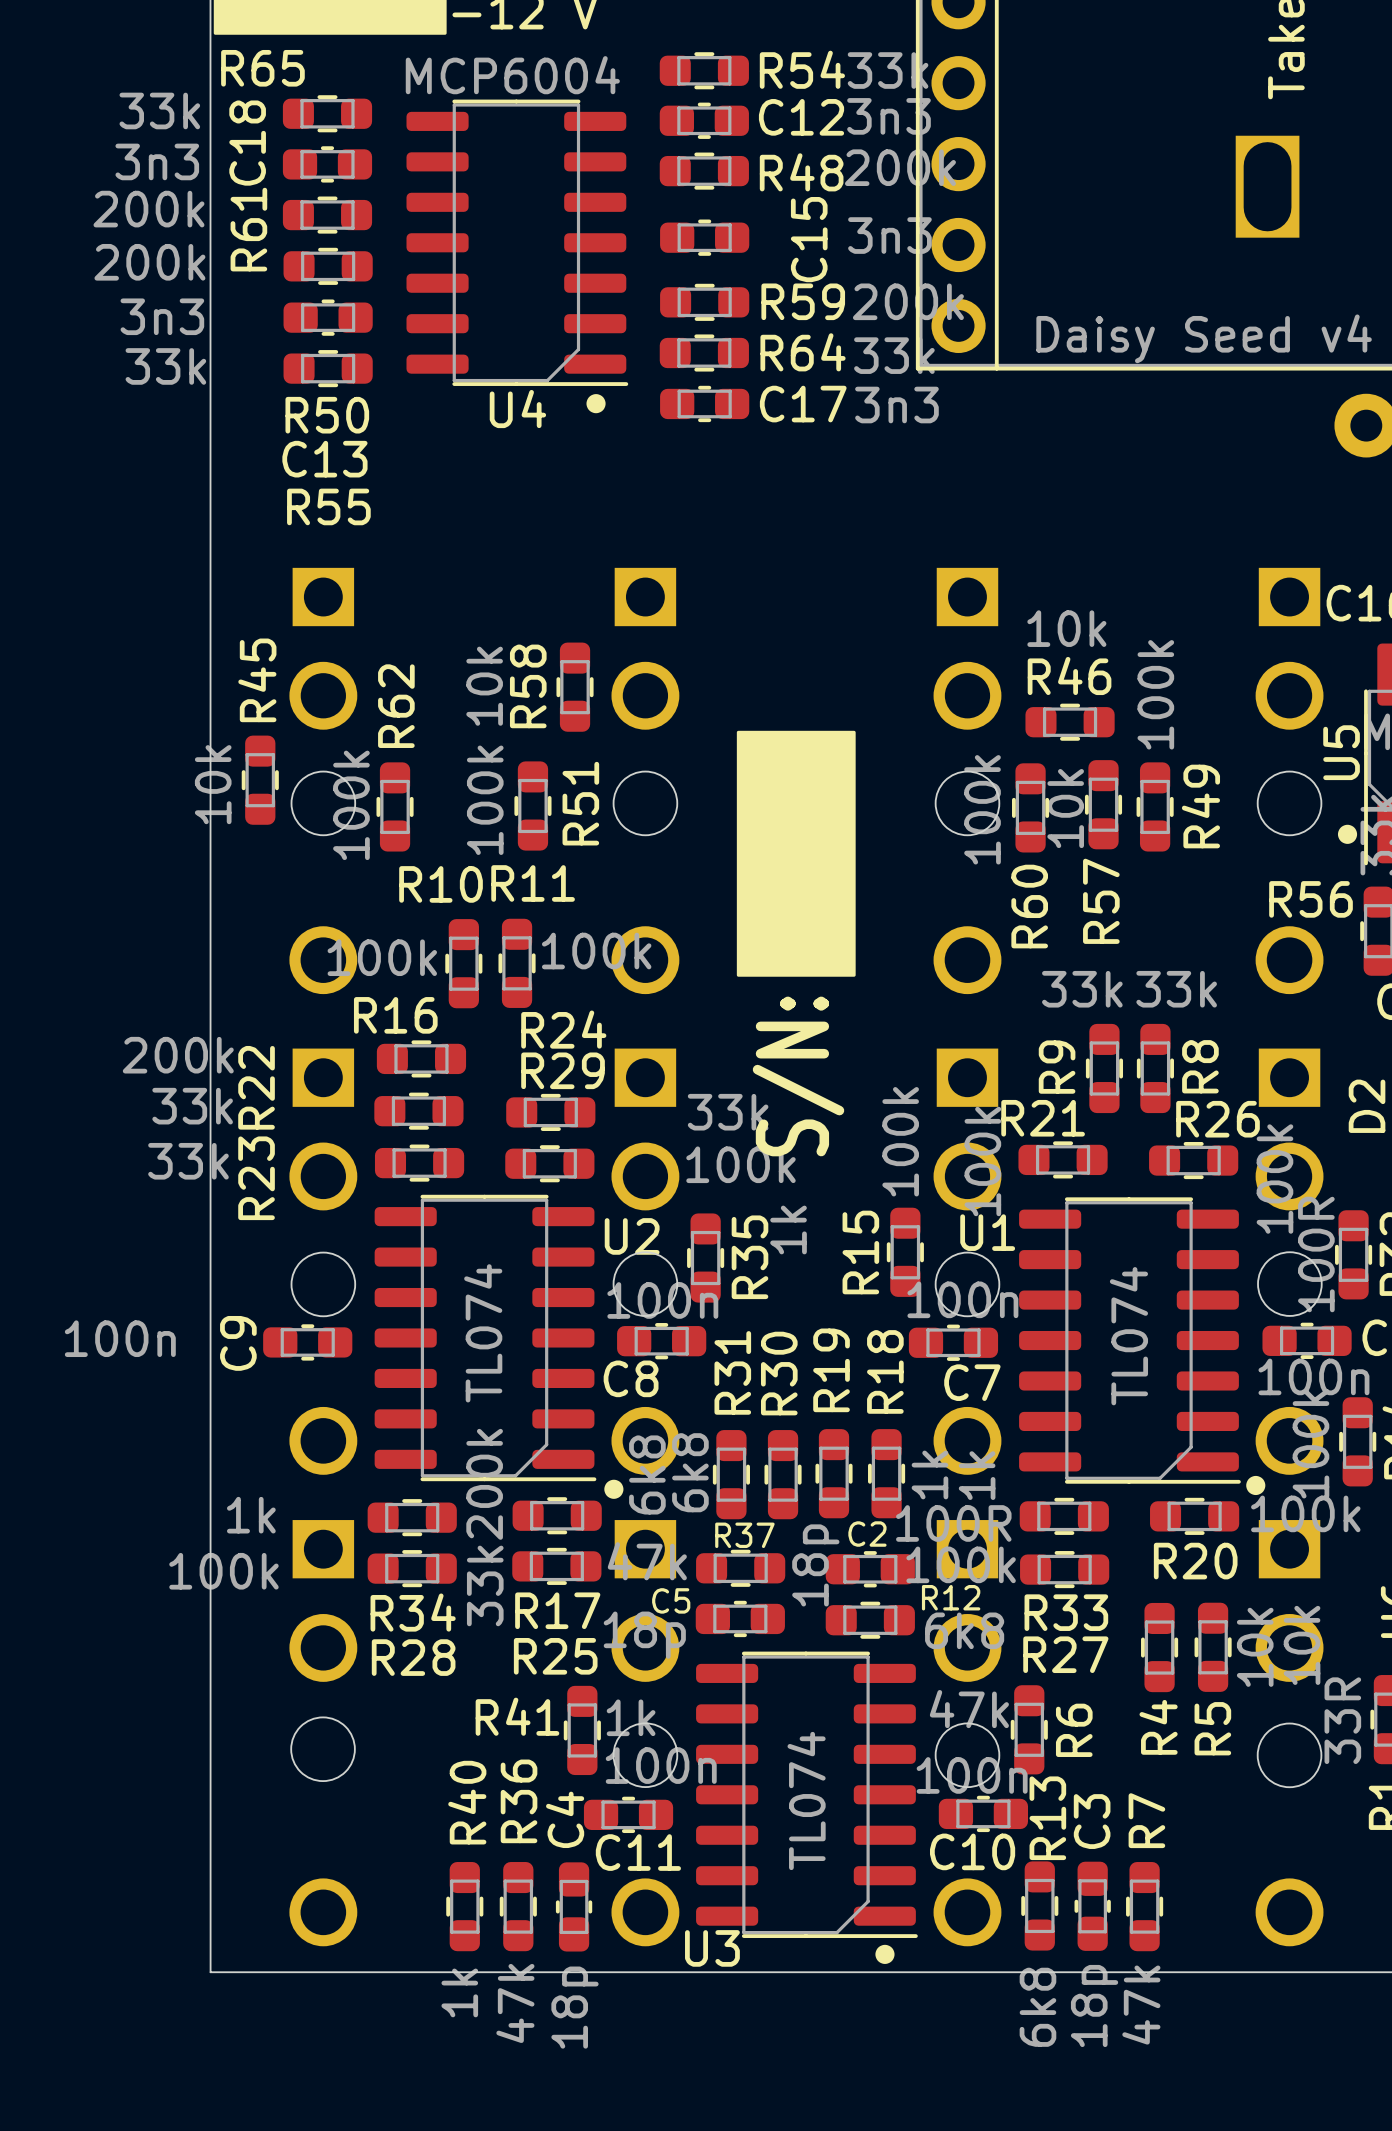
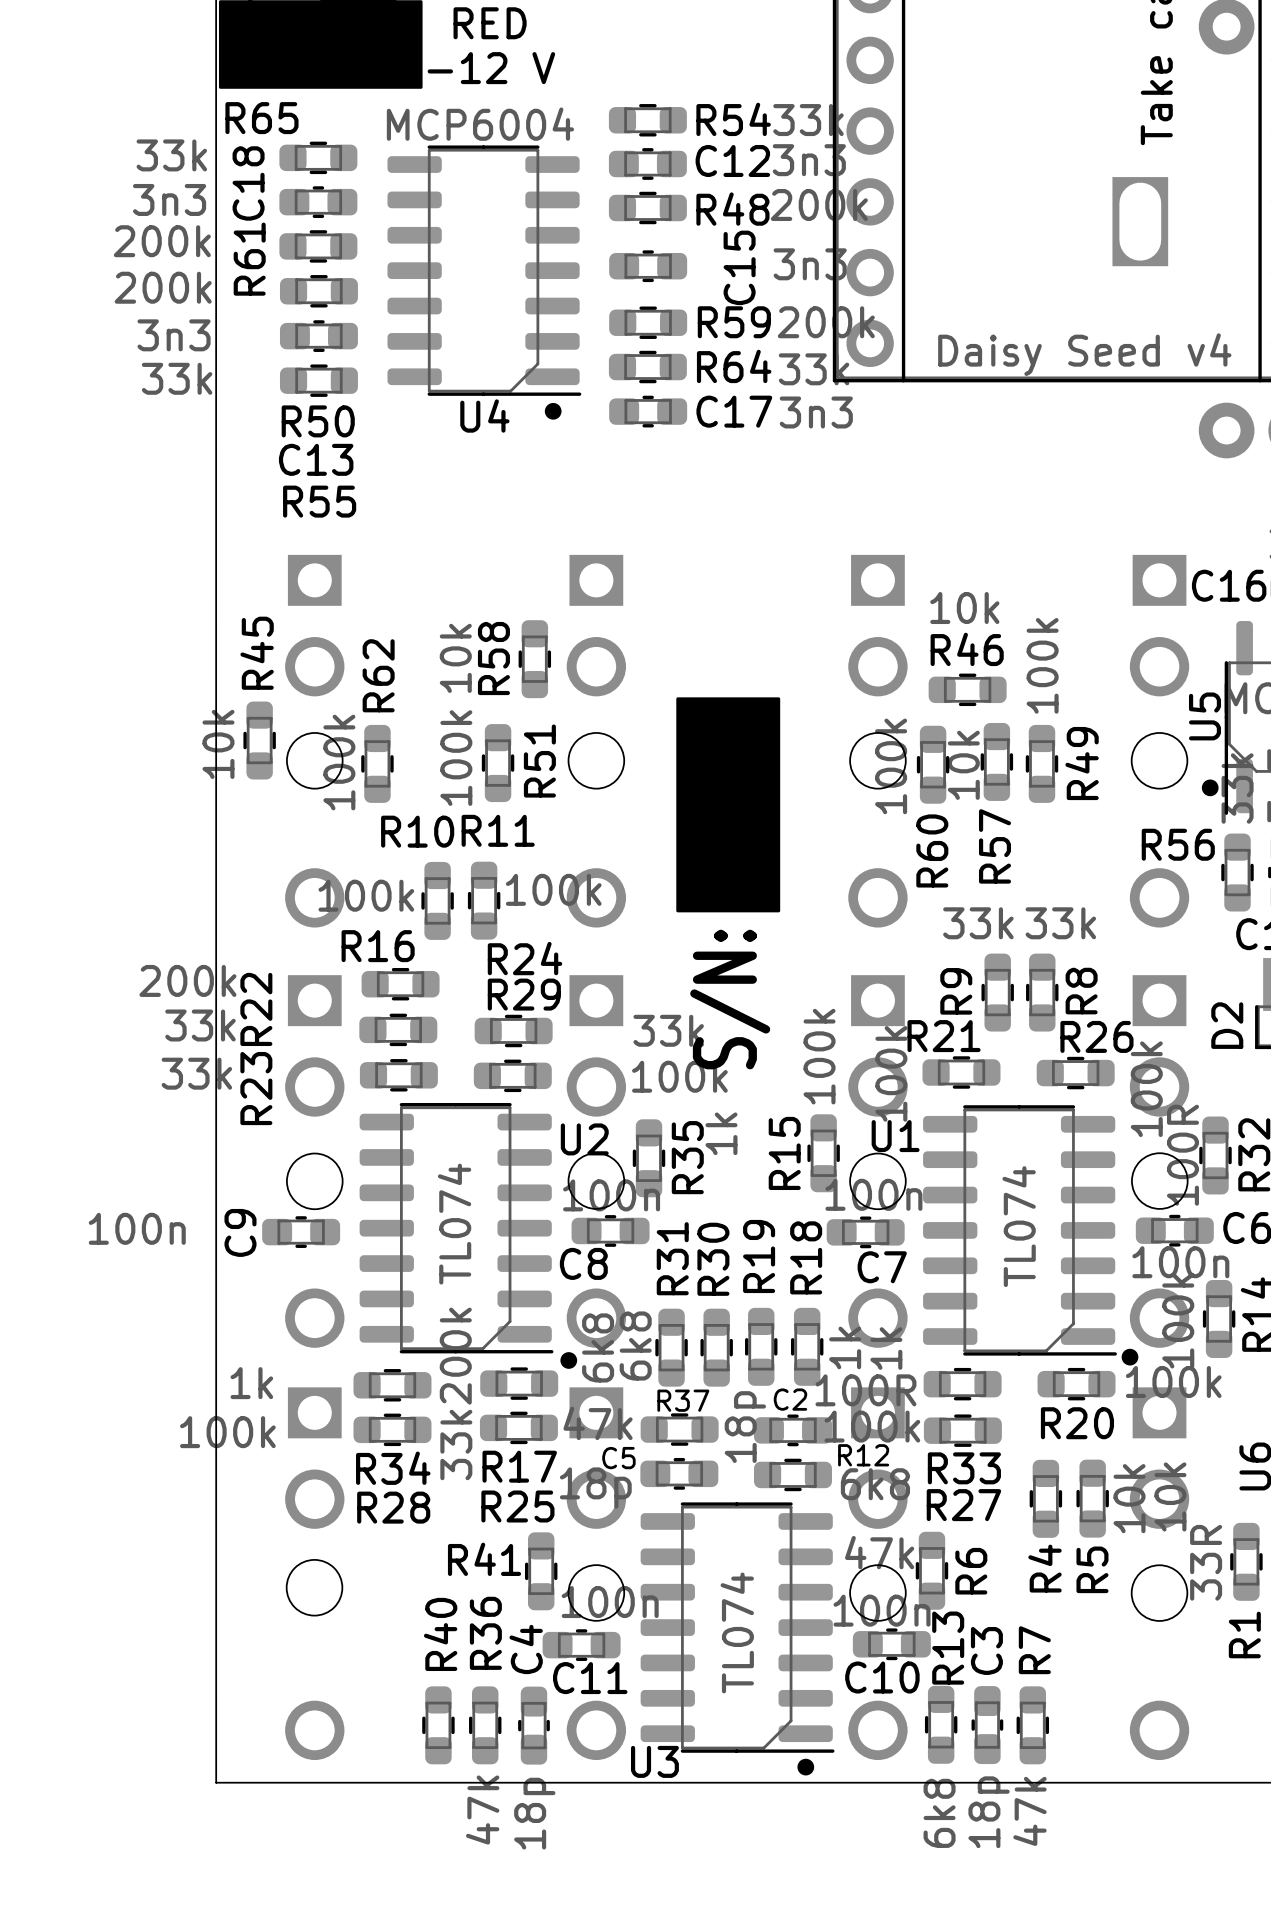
R41 value: 1k (631, 1717) -> none
R40 value: 1k (459, 1992) -> none

